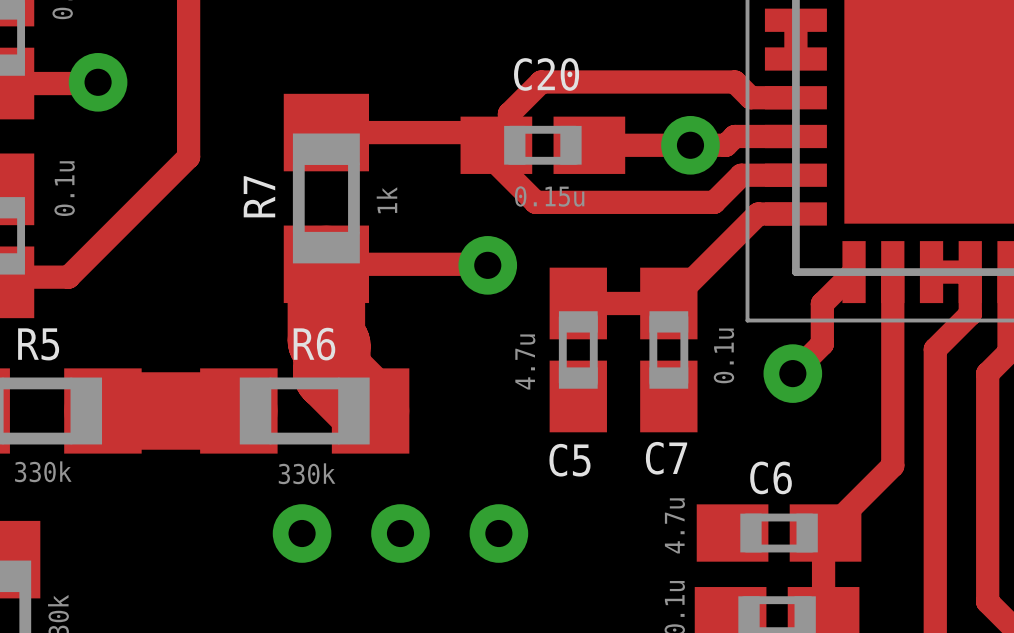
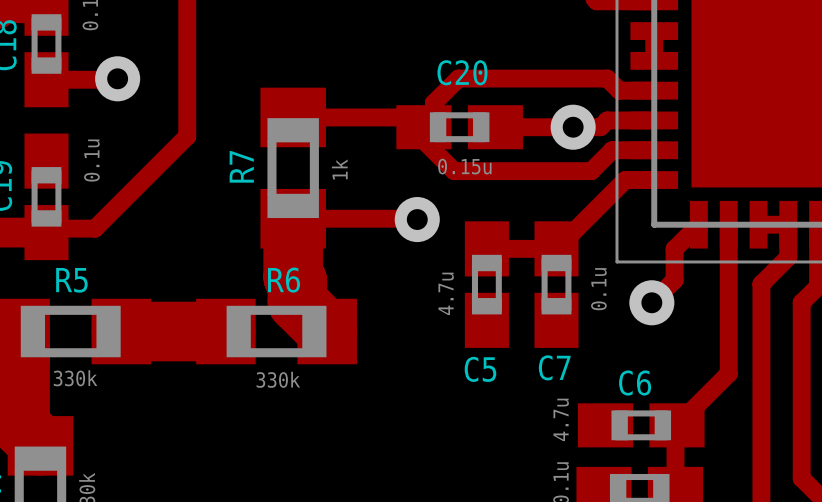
via: (302, 533) -> none
via: (400, 533) -> none
via: (498, 533) -> none

